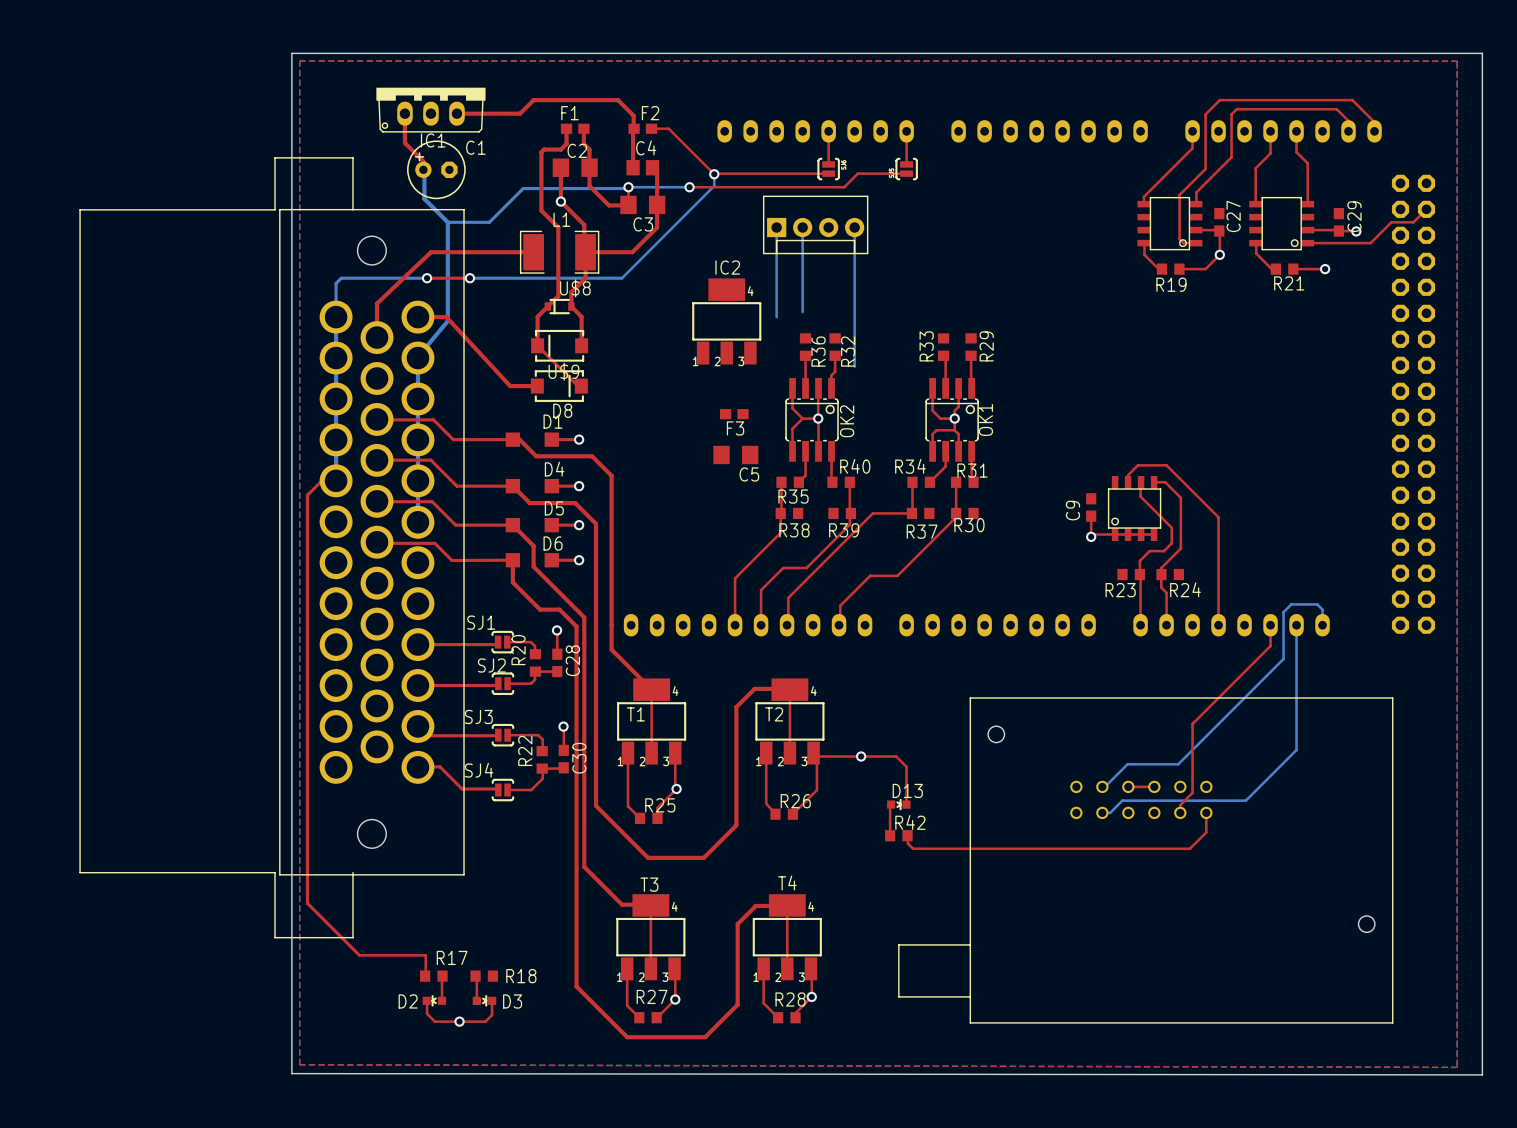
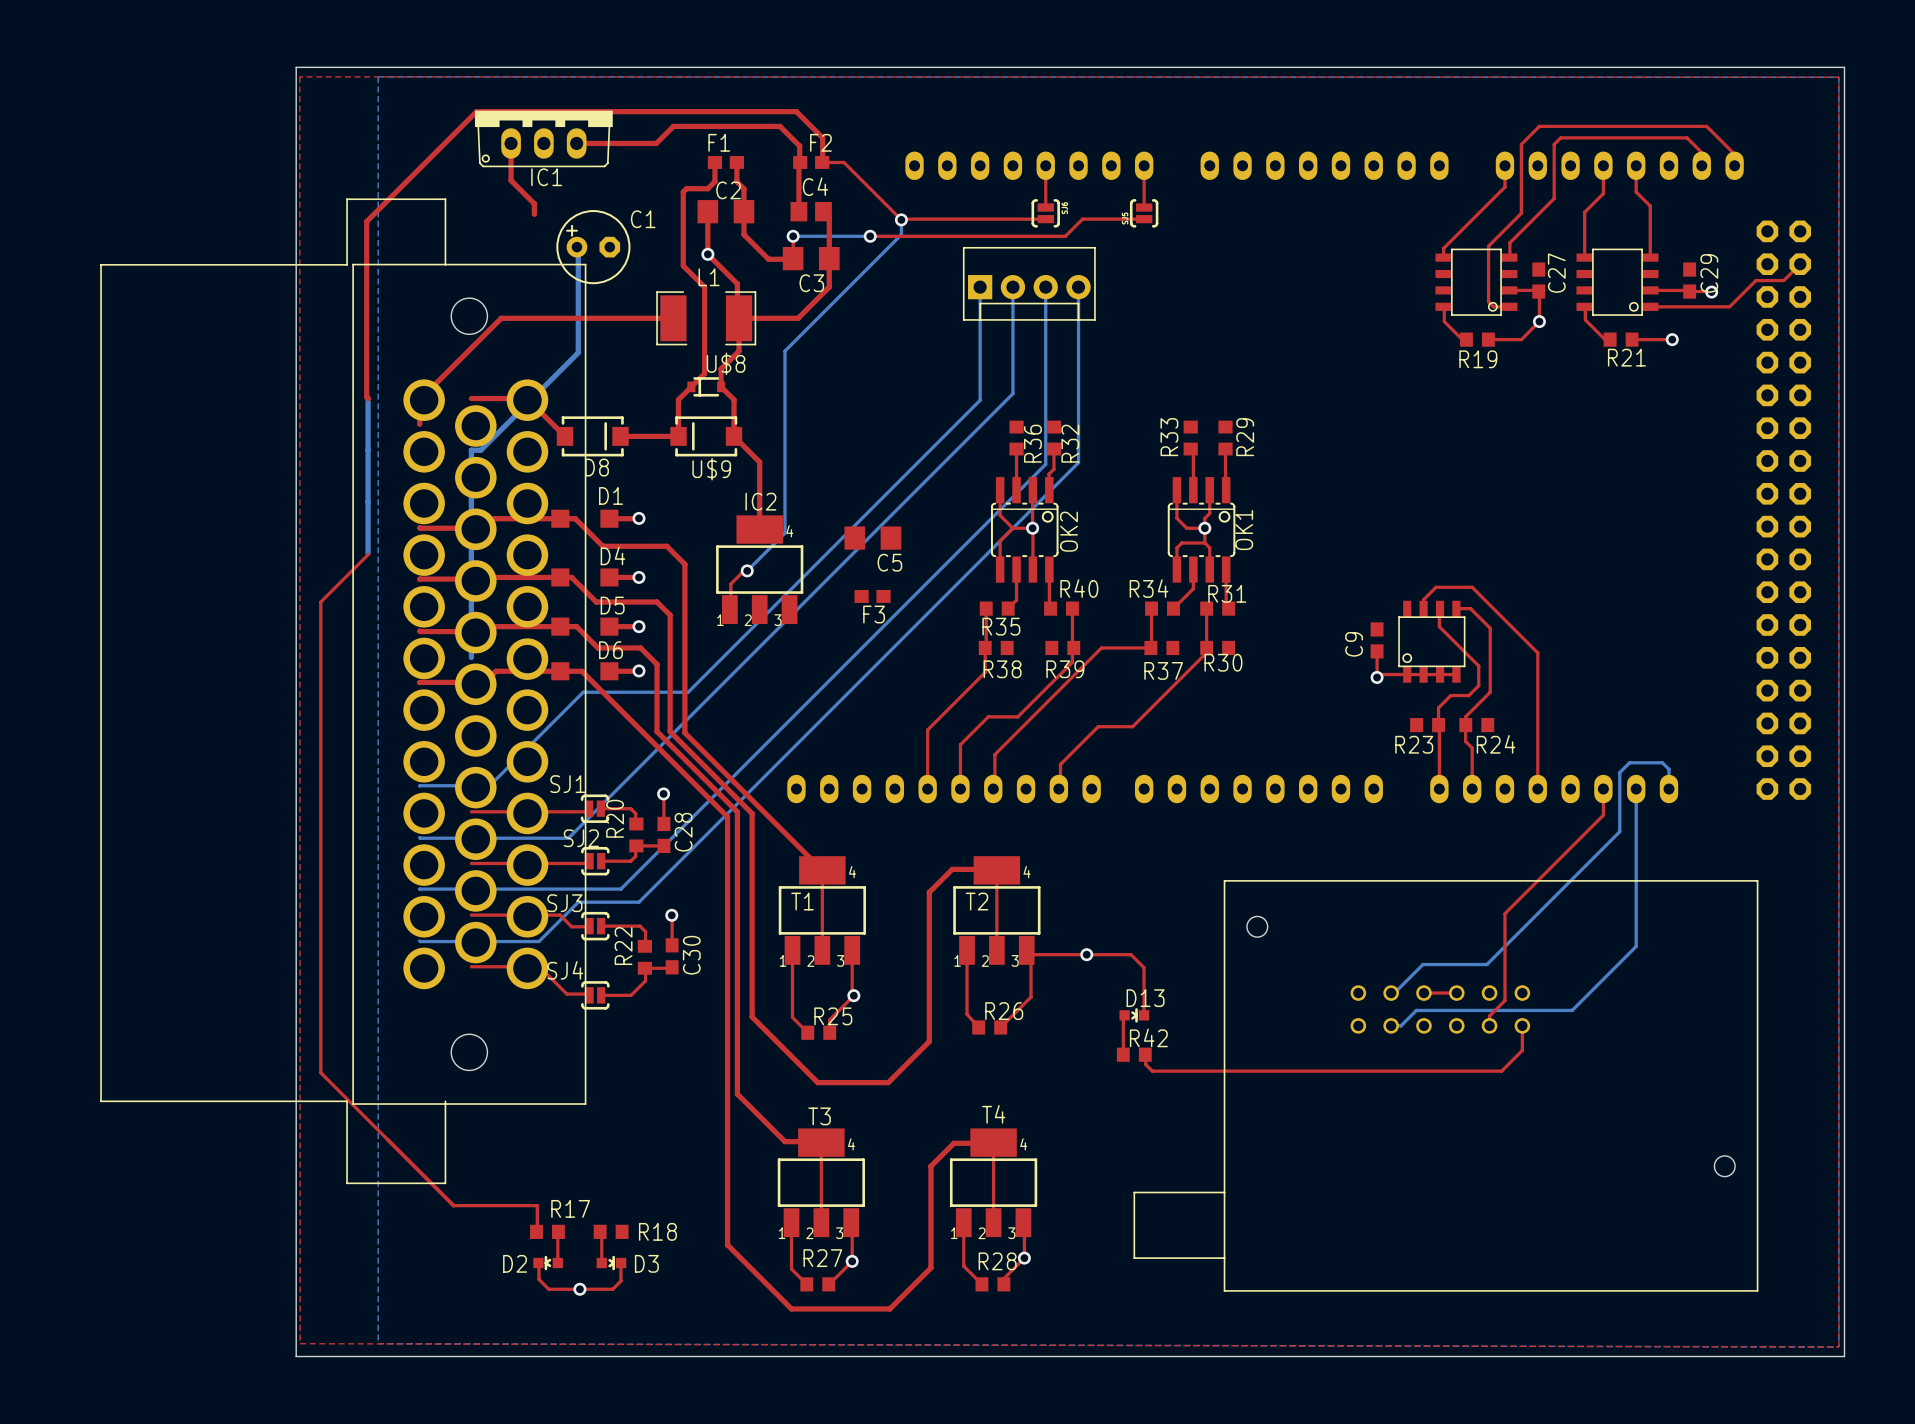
board edge: (291, 53) (291, 1073) (1482, 1074) (1482, 53) (1461, 53) -> (368, 67) (296, 67) (296, 1356) (1844, 1356) (1844, 67)
top zone outline: (299, 60) (299, 1064) (1457, 1067) -> (378, 76) (299, 76) (300, 1343) (1838, 1347)
top track: none -> (822, 160) (822, 137) (796, 111) (476, 111) (366, 221) (366, 397) (368, 398)
bottom track: (423, 169) (424, 198) (447, 222) -> none
C1 position: (436, 169) -> (593, 247)
bottom track: (628, 187) (523, 188) (489, 222) (447, 222) -> none
bottom track: none -> (576, 247) (578, 352) (480, 450) (471, 450) (471, 657)
bottom track: (447, 222) (447, 321) (417, 358) (417, 522) -> none
bottom track: none -> (1045, 287) (1045, 464) (620, 889) (419, 889)
top track: (430, 252) (377, 303) (377, 337) -> (543, 318) (501, 318) (419, 399) (419, 424)
top track: (427, 278) (469, 278) -> none
bottom track: (427, 278) (341, 278) (336, 283) (336, 480) -> none
via: (427, 278) -> none
bottom track: (469, 278) (622, 278) -> (747, 570) (784, 533) (784, 351)
via: (469, 278) -> none
bottom track: none -> (1012, 393) (568, 838) (419, 837)
bottom track: none -> (368, 398) (368, 553)
top track: none -> (471, 398) (527, 398) (564, 436)
top track: (417, 317) (446, 317) (510, 386) (537, 386) -> none
bottom track: none -> (980, 400) (688, 692) (583, 692) (489, 785) (419, 785)
IC2 position: (726, 321) -> (759, 569)
top track: (537, 345) (577, 386) (581, 386) -> (678, 436) (620, 436)
top track: none -> (734, 436) (759, 462) (759, 529)
bottom track: none -> (1078, 462) (638, 902) (578, 902) (538, 941) (419, 940)
D8 position: (559, 386) -> (592, 436)
top track: none -> (638, 518) (609, 518)
via: none -> (638, 518)
F3 position: (734, 414) -> (872, 596)
top track: (377, 419) (369, 419) (433, 419) (453, 439) (519, 439) (536, 456) (592, 456) (611, 475) (611, 649) -> (419, 527) (484, 528) (494, 518) (575, 518) (602, 546) (666, 546) (684, 564) (684, 732) (771, 819)
D1 position: (532, 439) -> (584, 518)
top track: (551, 439) (579, 439) -> none
via: (579, 439) -> none
top track: none -> (747, 570) (743, 570) (730, 584) (729, 609)
via: none -> (747, 570)
C5 position: (735, 454) -> (872, 538)
top track: none -> (609, 577) (638, 577)
via: none -> (638, 577)
top track: (377, 460) (369, 460) (430, 460) (456, 486) (512, 486) (529, 503) (575, 503) (596, 523) (596, 644) -> (419, 579) (571, 577) (596, 602) (657, 602) (670, 615) (670, 731) (752, 813)
top track: (336, 480) (321, 480) (307, 495) (307, 903) -> (368, 554) (320, 602) (320, 1072) (388, 1140)
D4 position: (532, 486) -> (584, 577)
top track: (551, 486) (579, 486) -> none
via: (579, 486) -> none
top track: none -> (609, 626) (638, 626)
via: none -> (638, 626)
top track: (377, 501) (369, 501) (432, 501) (455, 525) (512, 525) (533, 545) (533, 566) (584, 617) (584, 643) -> (419, 631) (483, 631) (488, 626) (576, 626) (597, 647) (640, 647) (657, 664) (657, 731) (737, 811)
D5 position: (532, 525) -> (584, 626)
top track: (551, 525) (579, 525) -> none
via: (579, 525) -> none
top track: none -> (638, 670) (609, 671)
via: none -> (638, 670)
top track: (377, 542) (370, 543) (434, 543) (452, 560) (512, 560) (512, 582) (540, 609) (559, 609) (576, 626) (576, 647) -> (419, 682) (484, 682) (495, 671) (581, 671) (727, 816)
D6 position: (532, 560) -> (584, 671)
top track: (551, 560) (579, 560) -> none
via: (579, 560) -> none
top track: (557, 630) (557, 654) -> (663, 793) (663, 823)
via position: (557, 630) -> (663, 793)
top track: none -> (589, 808) (586, 811) (471, 811)
top track: (498, 642) (495, 644) (417, 644) -> none
SJ1 position: (502, 642) -> (595, 808)
top track: (507, 642) (531, 642) (534, 646) (535, 654) -> (600, 808) (630, 808) (635, 813) (636, 823)
R20 position: (535, 662) -> (636, 834)
C28 position: (557, 662) -> (663, 834)
top track: (557, 671) (535, 671) (534, 679) (531, 683) (507, 683) -> (663, 845) (636, 845) (635, 856) (630, 861) (601, 861)
top track: none -> (589, 861) (587, 863) (471, 863)
top track: (498, 683) (496, 685) (417, 685) -> none
SJ2 position: (502, 683) -> (595, 861)
top track: none -> (471, 915) (560, 915) (571, 926) (589, 926)
top track: (417, 726) (429, 735) (498, 735) -> none
top track: (563, 726) (563, 750) -> (671, 915) (672, 945)
via position: (563, 726) -> (671, 915)
SJ3 position: (502, 735) -> (595, 926)
top track: (507, 735) (538, 735) (542, 739) (542, 751) -> (601, 926) (639, 926) (645, 931) (644, 946)
R22 position: (542, 759) -> (644, 957)
C30 position: (563, 759) -> (672, 956)
top track: none -> (471, 966) (539, 966) (566, 994) (589, 995)
top track: (417, 767) (440, 766) (462, 788) (498, 790) -> none
top track: (563, 767) (542, 768) (542, 778) (531, 790) (507, 790) -> (672, 967) (644, 968) (645, 980) (631, 995) (601, 995)
SJ4 position: (502, 790) -> (595, 995)

